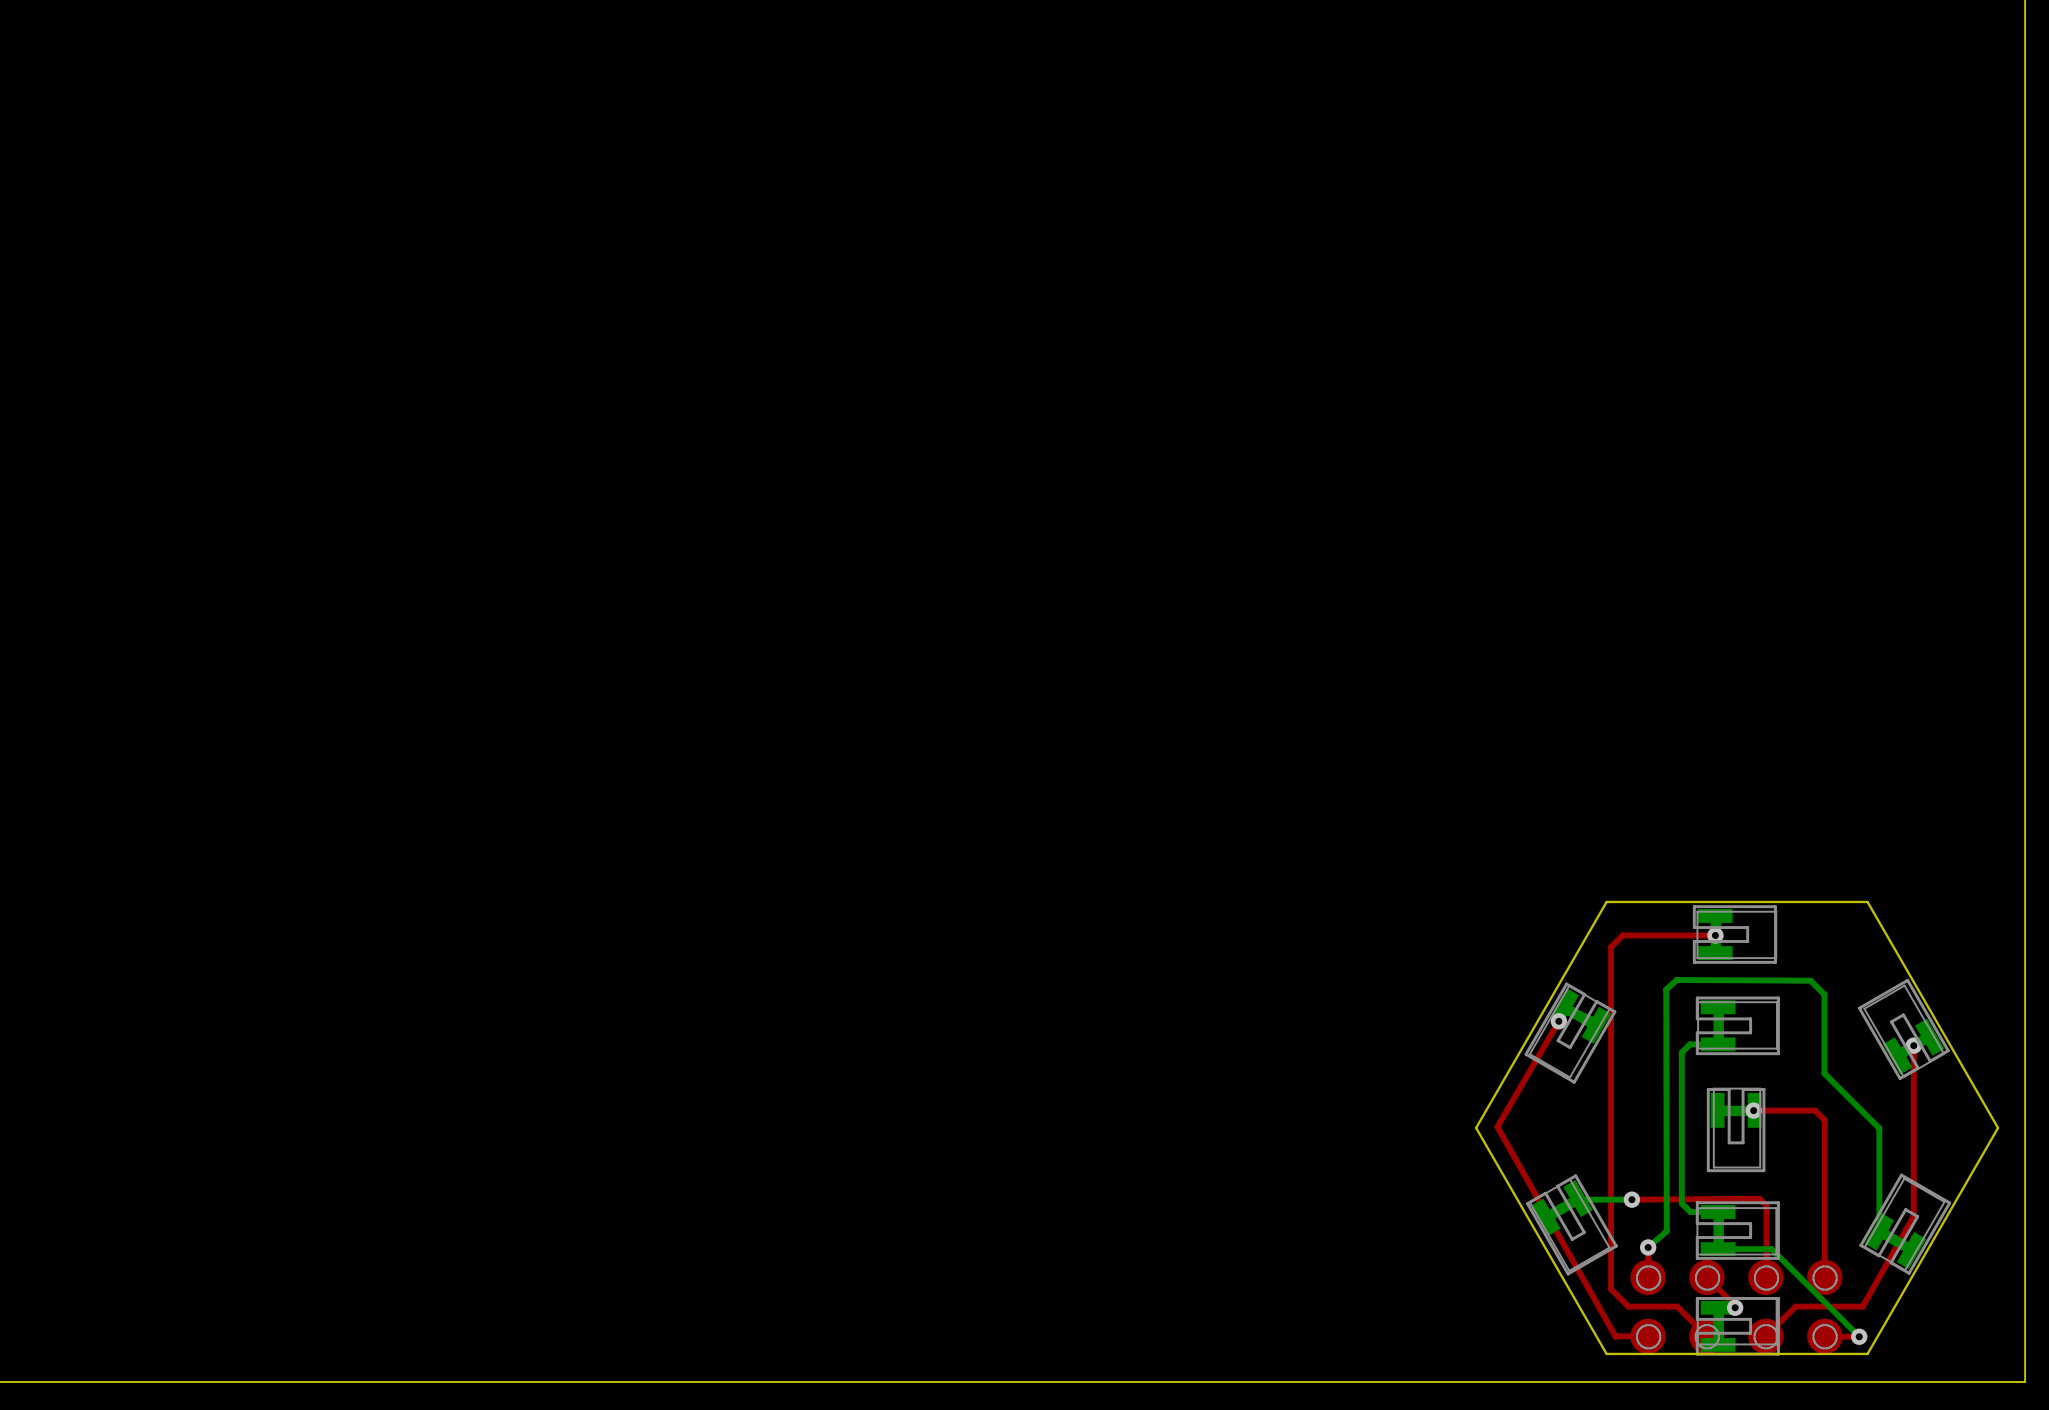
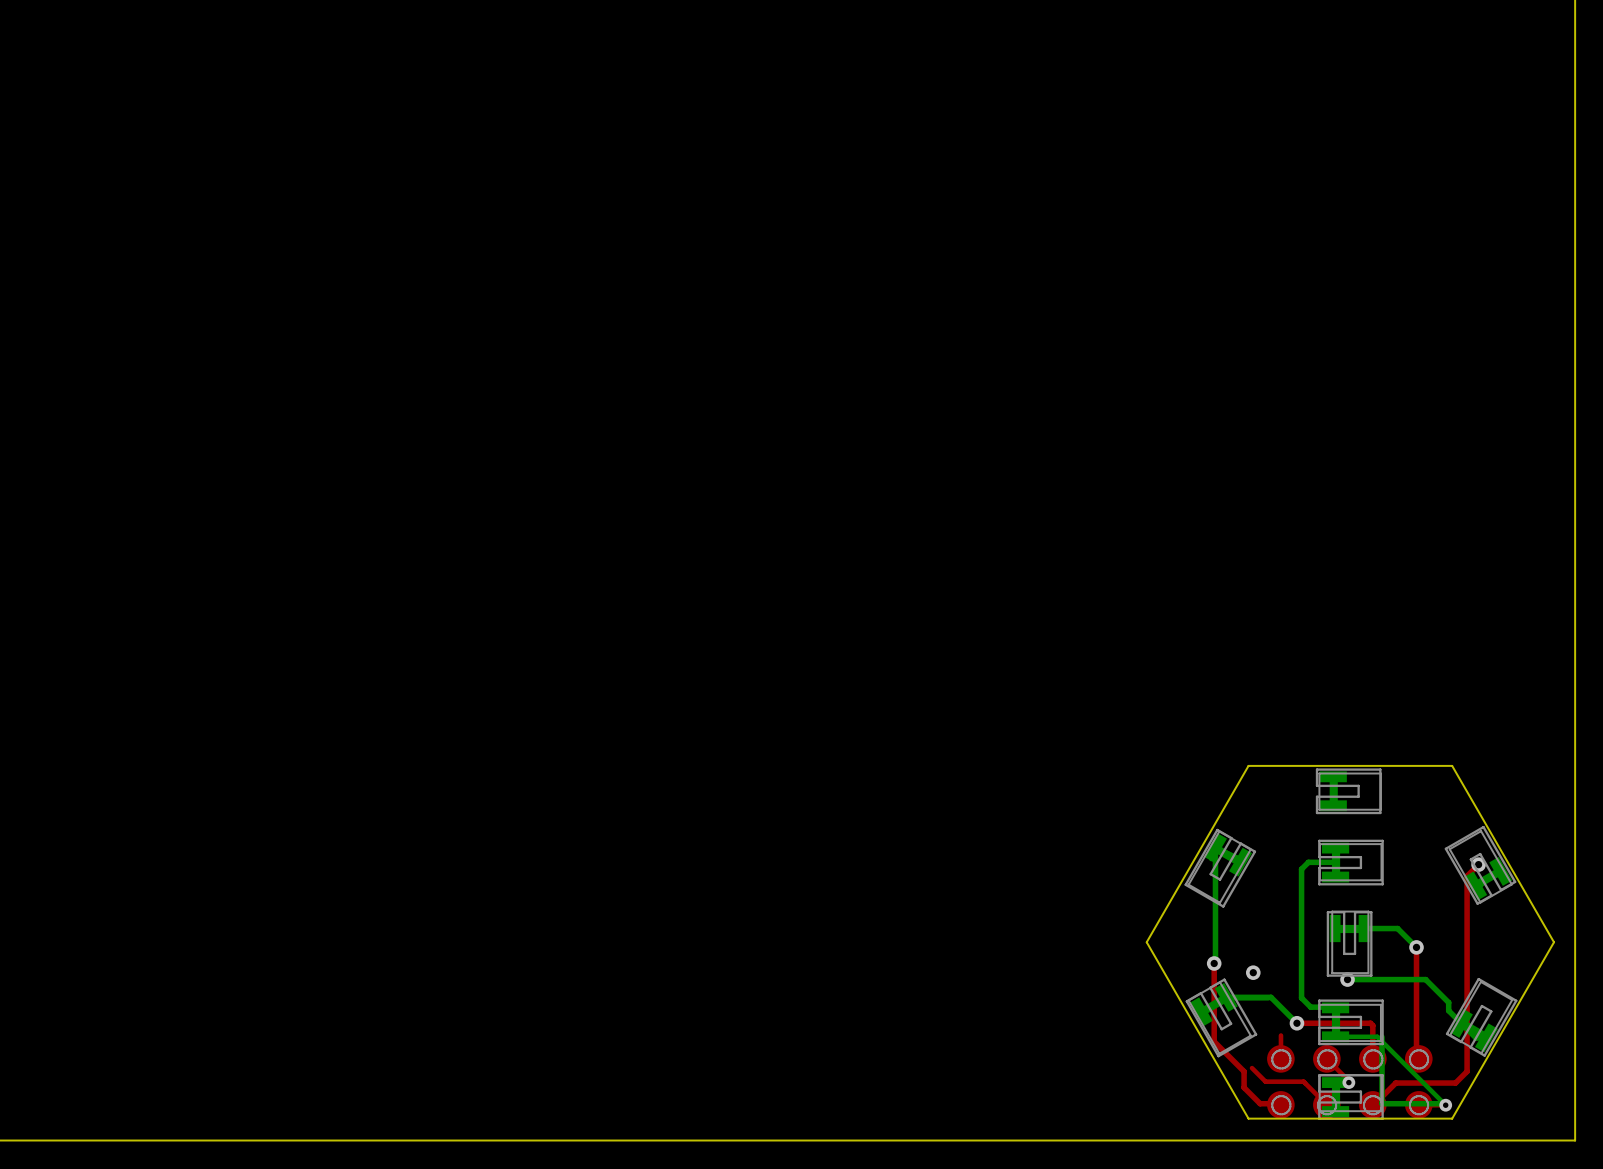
top track: (1715, 935) (1622, 935) (1611, 947) (1611, 1289) -> none
via: (1715, 935) -> none
bottom track: none -> (1215, 847) (1214, 963)
top track: (1558, 1021) (1497, 1126) (1615, 1336) (1648, 1336) -> (1214, 963) (1214, 1041) (1244, 1071) (1244, 1087) (1260, 1103) (1280, 1104)
via: (1558, 1021) -> none
bottom track: (1718, 1044) (1690, 1044) (1681, 1052) (1681, 1203) (1690, 1211) (1718, 1211) -> (1335, 848) (1336, 862) (1308, 862) (1301, 869) (1301, 997) (1310, 1007) (1335, 1007)
top track: (1913, 1045) (1913, 1216) (1862, 1306) (1795, 1306) (1765, 1336) -> (1478, 864) (1467, 876) (1467, 1071) (1455, 1083) (1395, 1083) (1372, 1104)
via position: (1913, 1045) -> (1478, 864)
top track: (1753, 1110) (1815, 1110) (1824, 1120) (1824, 1277) -> (1416, 947) (1416, 1056) (1418, 1058)
via: (1753, 1110) -> none
bottom track: none -> (1364, 928) (1397, 928) (1416, 947)
via: none -> (1416, 947)
via: none -> (1214, 963)
via: none -> (1253, 972)
via: none -> (1347, 979)
bottom track: none -> (1226, 997) (1271, 997) (1296, 1023)
top track: (1631, 1199) (1759, 1198) (1766, 1205) (1765, 1277) -> (1296, 1023) (1370, 1023) (1372, 1025) (1372, 1058)
via: (1631, 1199) -> none
via: none -> (1296, 1023)
bottom track: (1648, 1247) (1666, 1231) (1666, 989) (1676, 980) (1810, 980) (1824, 994) (1824, 1073) (1879, 1128) (1879, 1231) (1911, 1250) -> (1347, 979) (1425, 979) (1448, 1002) (1448, 1010) (1475, 1037) (1486, 1037)
via: (1648, 1247) -> none
bottom track: none -> (1382, 1037) (1382, 1103) (1446, 1103)

